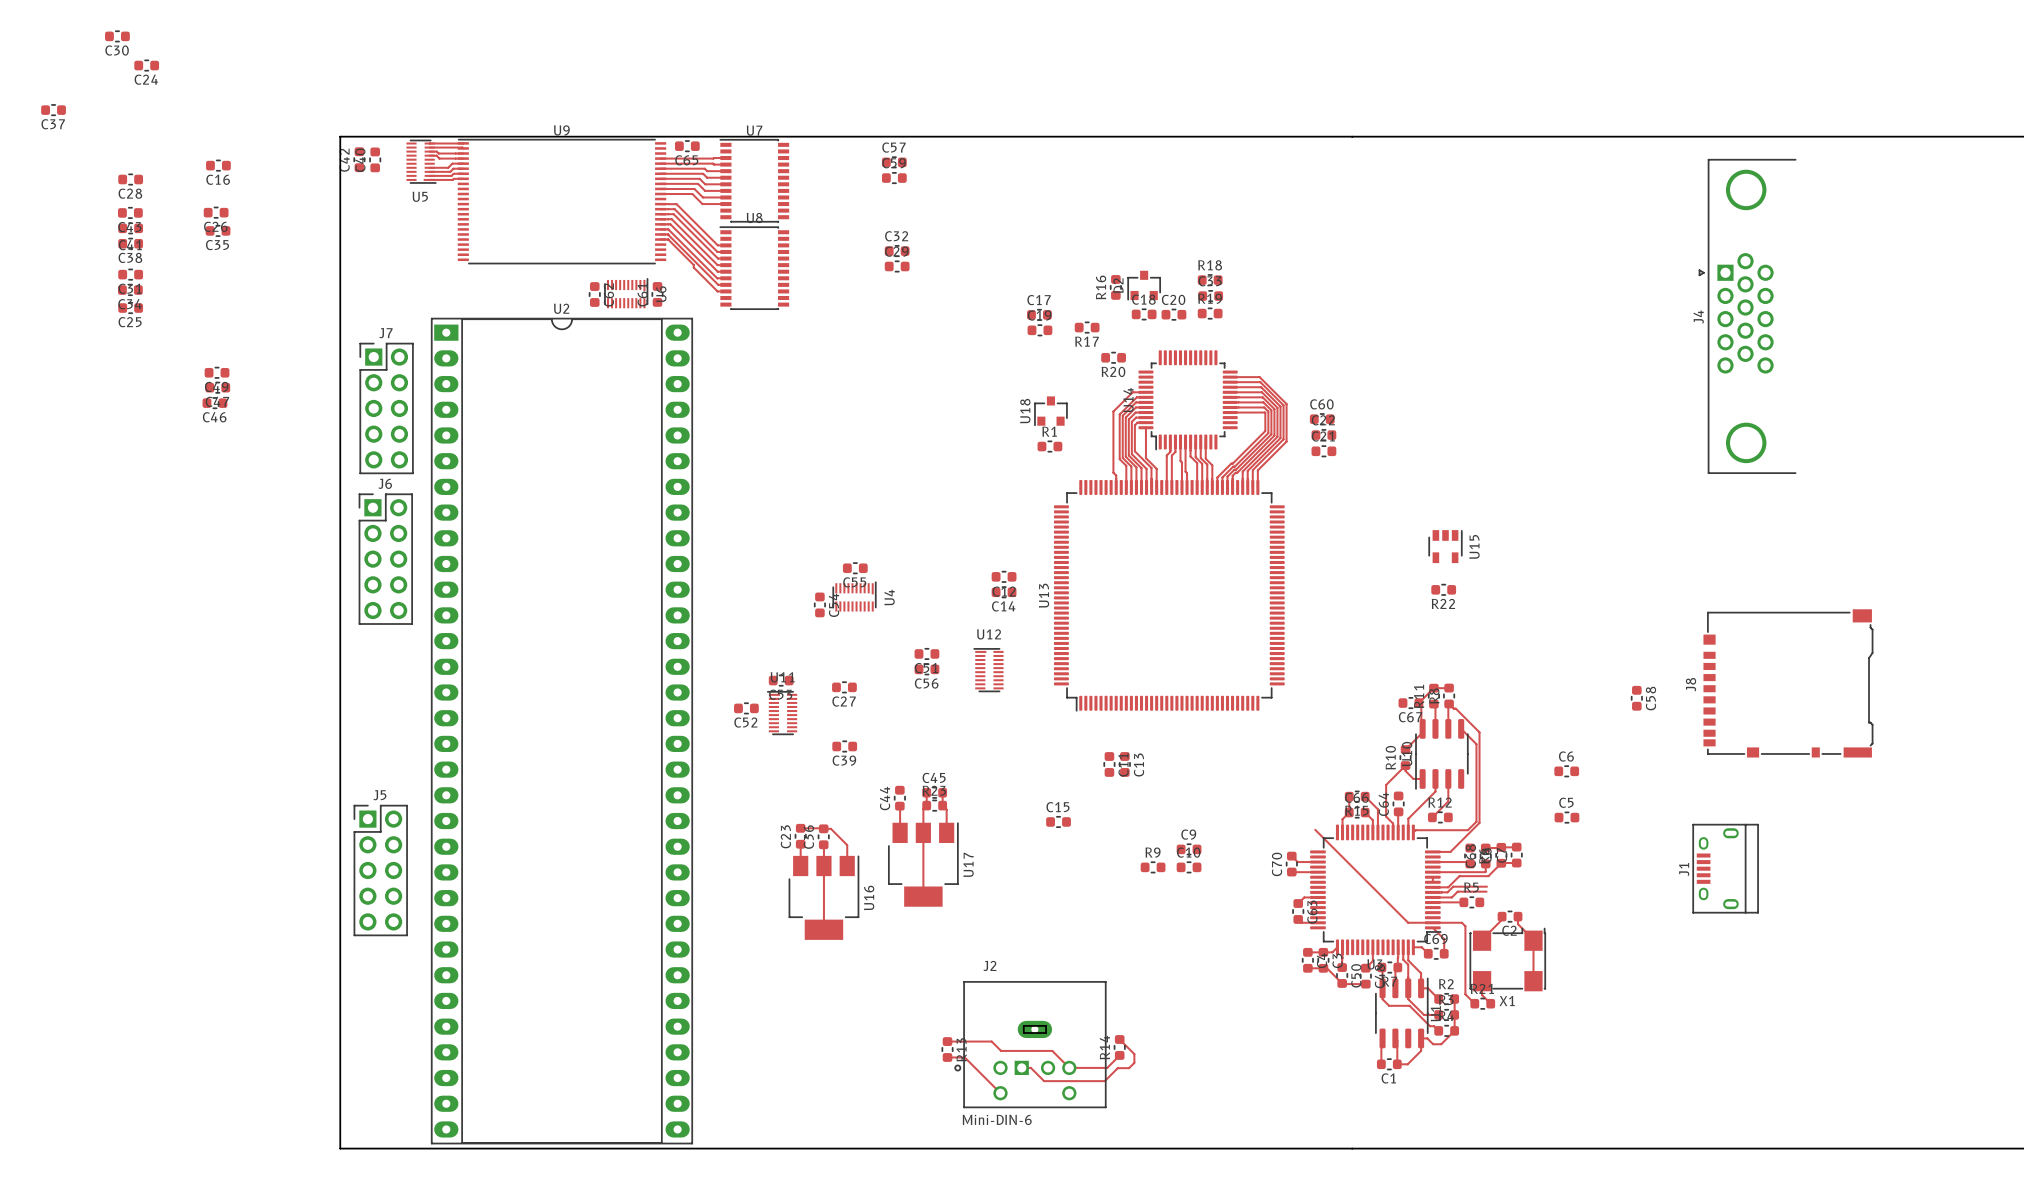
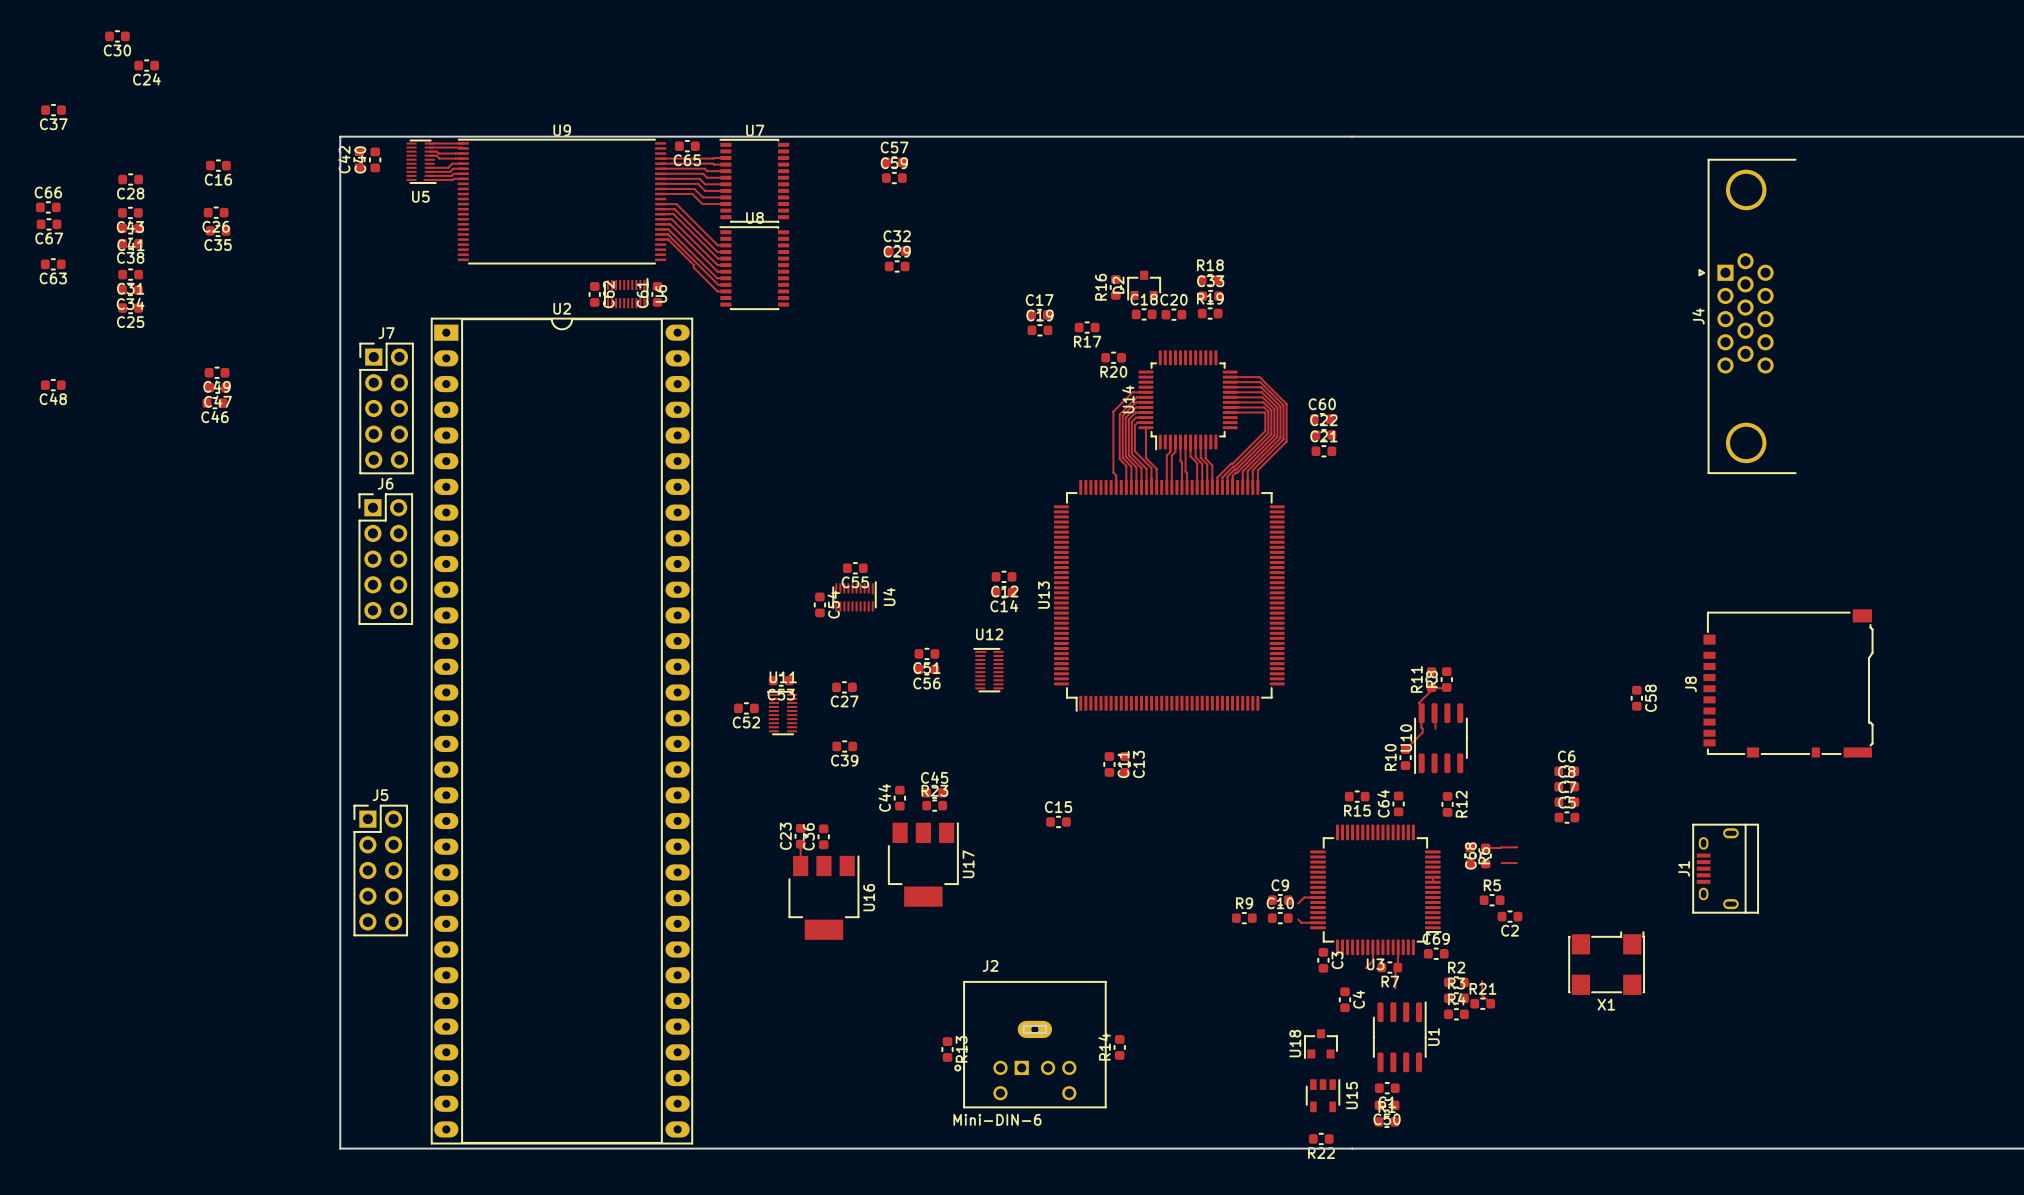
U18 position: (1050, 411) -> (1320, 1043)
R1 position: (1049, 446) -> (1386, 1121)
U15 position: (1445, 546) -> (1323, 1095)
R22 position: (1443, 589) -> (1321, 1138)
R11 position: (1433, 696) -> (1431, 679)
R8 position: (1449, 696) -> (1446, 679)
C67 position: (1410, 703) -> (48, 224)
track: (1448, 728) (1449, 703) (1479, 732) (1479, 822) (1450, 851) (1432, 851) -> none
track: (1461, 728) (1476, 744) (1476, 821) (1467, 830) (1415, 830) (1413, 832) -> none
U10 position: (1441, 754) -> (1440, 738)
track: (1422, 778) (1413, 778) (1405, 771) (1405, 765) (1386, 784) (1386, 816) (1393, 823) (1393, 832) -> none
track: (1435, 778) (1435, 791) (1408, 818) (1408, 832) -> none
track: (1448, 778) (1448, 801) (1432, 817) -> none
track: (926, 792) (926, 805) (923, 808) (923, 896) -> none
track: (942, 792) (942, 805) (946, 809) (946, 832) -> none
track: (1349, 796) (1349, 812) (1342, 819) (1342, 832) -> none
track: (1365, 796) (1377, 809) (1377, 832) -> none
track: (899, 806) (900, 832) -> none
track: (1398, 811) (1398, 832) -> none
C66 position: (1357, 812) -> (48, 207)
track: (1365, 812) (1372, 820) (1372, 832) -> none
R12 rotation: 0° (1440, 817) -> 90° clockwise (1447, 804)
R12 position: (1440, 817) -> (1447, 804)
track: (800, 828) (830, 828) (847, 845) (847, 866) -> none
track: (1315, 829) (1408, 922) (1461, 922) (1465, 926) (1465, 994) (1474, 1003) -> none
track: (823, 844) (823, 929) -> none
C9 position: (1189, 849) -> (1280, 900)
C8 rotation: 0° (1501, 855) -> 90° clockwise (1566, 786)
C8 position: (1501, 855) -> (1566, 786)
C7 rotation: 0° (1516, 855) -> 90° clockwise (1566, 802)
C7 position: (1516, 855) -> (1566, 802)
track: (1291, 856) (1297, 862) (1317, 862) -> none
track: (1471, 860) (1432, 862) -> none
track: (1485, 863) (1485, 872) (1432, 872) -> none
track: (1501, 863) (1488, 876) (1459, 876) (1448, 887) (1432, 887) -> none
C70: (1291, 864) -> none
R9 position: (1153, 867) -> (1244, 918)
C10 position: (1189, 867) -> (1280, 918)
track: (1291, 872) (1317, 872) -> none
track: (1487, 886) (1453, 886) (1447, 892) (1432, 892) -> none
track: (1486, 891) (1457, 891) (1451, 897) (1432, 897) -> none
track: (1463, 902) (1432, 902) -> none
R5 position: (1471, 902) -> (1492, 900)
C63 rotation: 0° (1298, 911) -> 90° clockwise (53, 264)
C63 position: (1298, 911) -> (53, 264)
track: (1502, 916) (1502, 919) (1482, 940) -> none
track: (1517, 916) (1517, 924) (1533, 939) (1533, 981) -> none
track: (1432, 927) (1444, 939) (1444, 953) -> none
track: (1337, 947) (1332, 952) (1307, 952) -> none
track: (1342, 947) (1342, 967) -> none
track: (1403, 947) (1403, 959) (1408, 964) (1408, 999) (1423, 1014) (1438, 1014) -> none
track: (1408, 947) (1408, 960) (1421, 973) (1421, 988) (1428, 988) (1438, 999) -> none
track: (1413, 947) (1421, 947) (1428, 953) -> none
X1 position: (1507, 959) -> (1606, 963)
C4 position: (1307, 960) -> (1344, 999)
track: (1381, 967) (1382, 999) (1389, 1005) (1409, 1005) (1430, 1026) (1434, 1026) (1438, 1030) -> none
track: (1307, 968) (1327, 968) (1342, 984) (1365, 984) -> none
C50 rotation: 0° (1342, 975) -> 90° clockwise (1387, 1105)
C50 position: (1342, 975) -> (1387, 1105)
C48 rotation: 0° (1365, 976) -> 90° clockwise (53, 385)
C48 position: (1365, 976) -> (53, 385)
R2 position: (1446, 999) -> (1456, 982)
track: (1454, 999) (1454, 1030) (1441, 1044) (1433, 1044) (1427, 1038) (1421, 1038) (1421, 1050) (1407, 1064) (1397, 1064) (1397, 1040) (1395, 1038) -> none
U1 position: (1401, 1013) -> (1399, 1036)
R3 position: (1446, 1014) -> (1456, 998)
R4 position: (1446, 1030) -> (1456, 1014)
track: (1382, 1038) (1381, 1064) -> none
track: (1119, 1039) (1134, 1054) (1134, 1062) (1129, 1068) (1117, 1068) (1104, 1081) (1044, 1081) (1030, 1067) (1021, 1067) -> none
track: (947, 1041) (991, 1041) (1001, 1050) (1052, 1050) (1069, 1067) (1107, 1067) (1119, 1055) -> none
track: (947, 1057) (964, 1057) (1000, 1093) -> none
C1 position: (1389, 1064) -> (1387, 1088)

